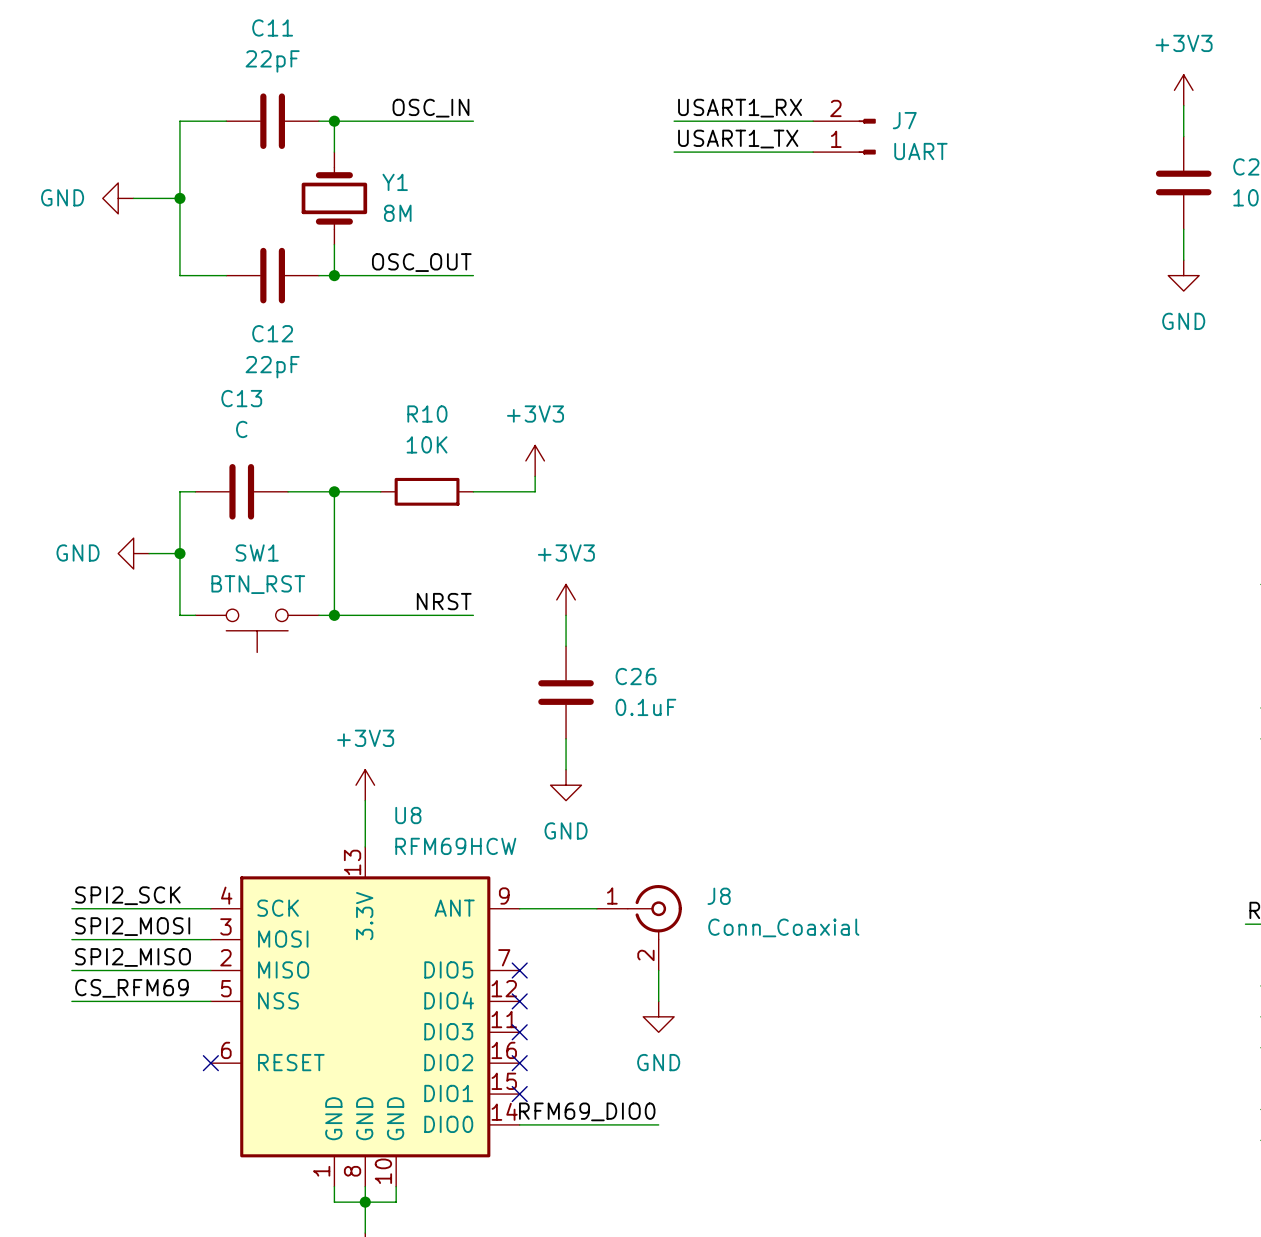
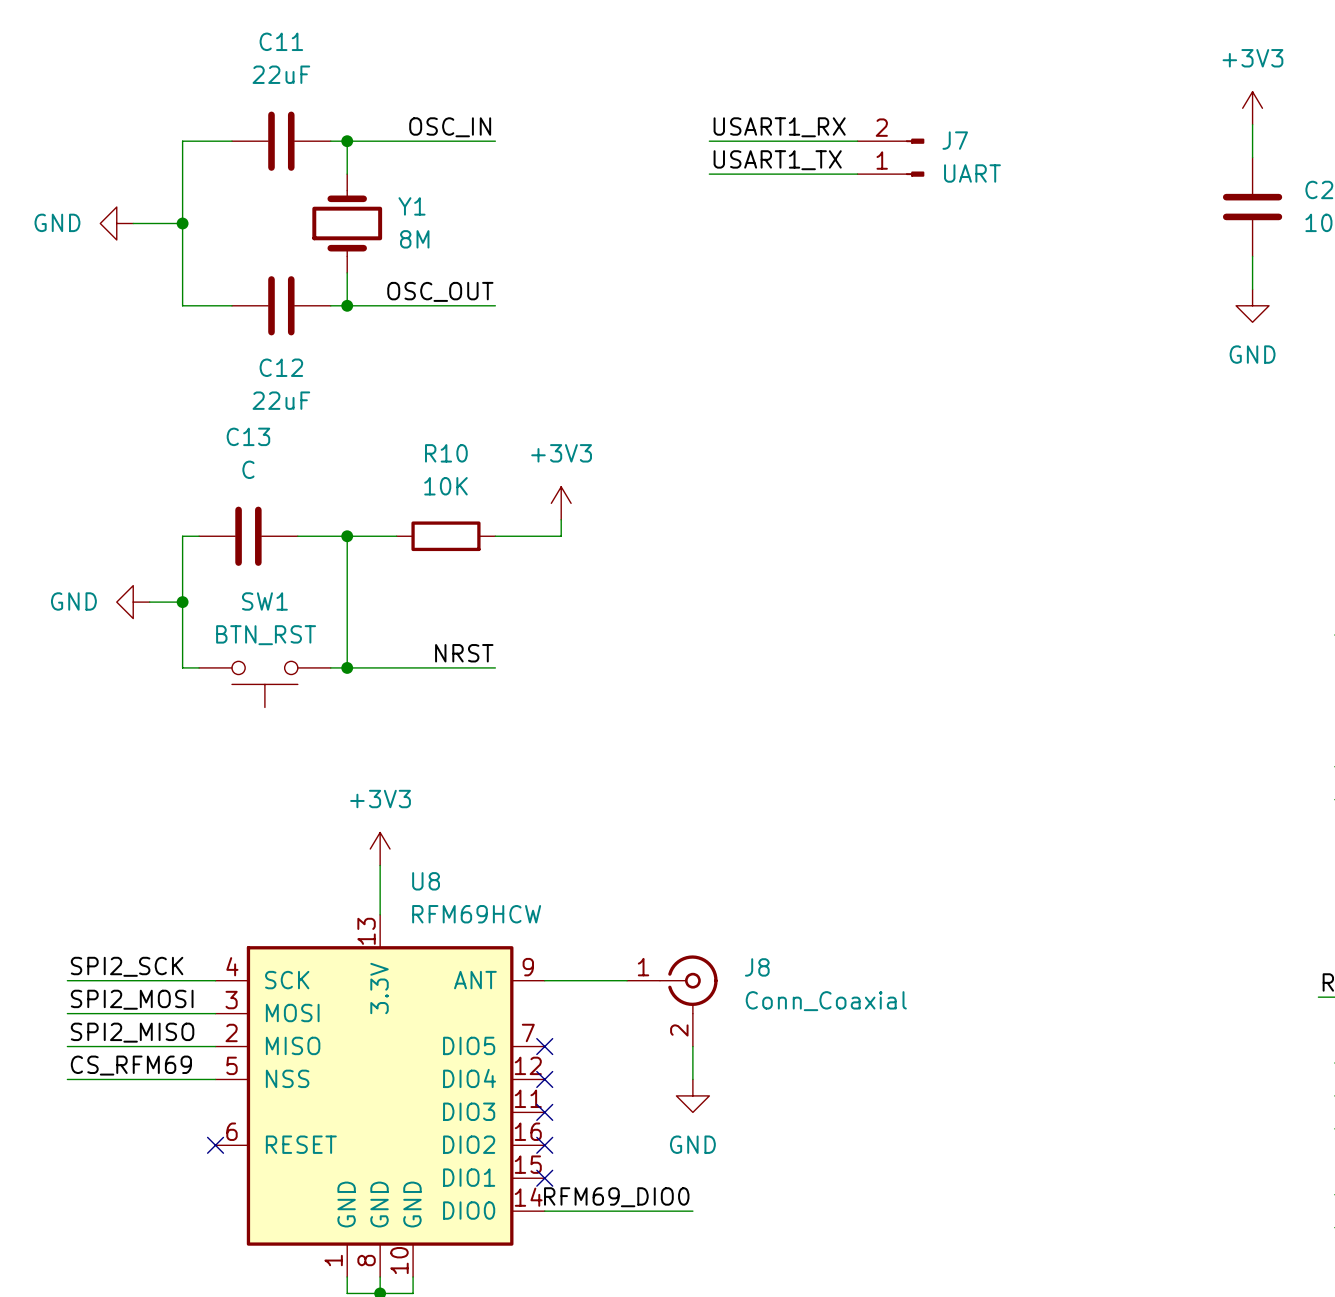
C11 value: 22pF (272, 61) -> 22uF (281, 74)
C12 value: 22pF (272, 367) -> 22uF (281, 400)
power symbol: +3V3 (566, 599) -> none
wire: (566, 615) (566, 646) -> none
C26: 0.1uF (566, 692) -> none
wire: (566, 738) (566, 769) -> none
power symbol: GND (566, 785) -> none

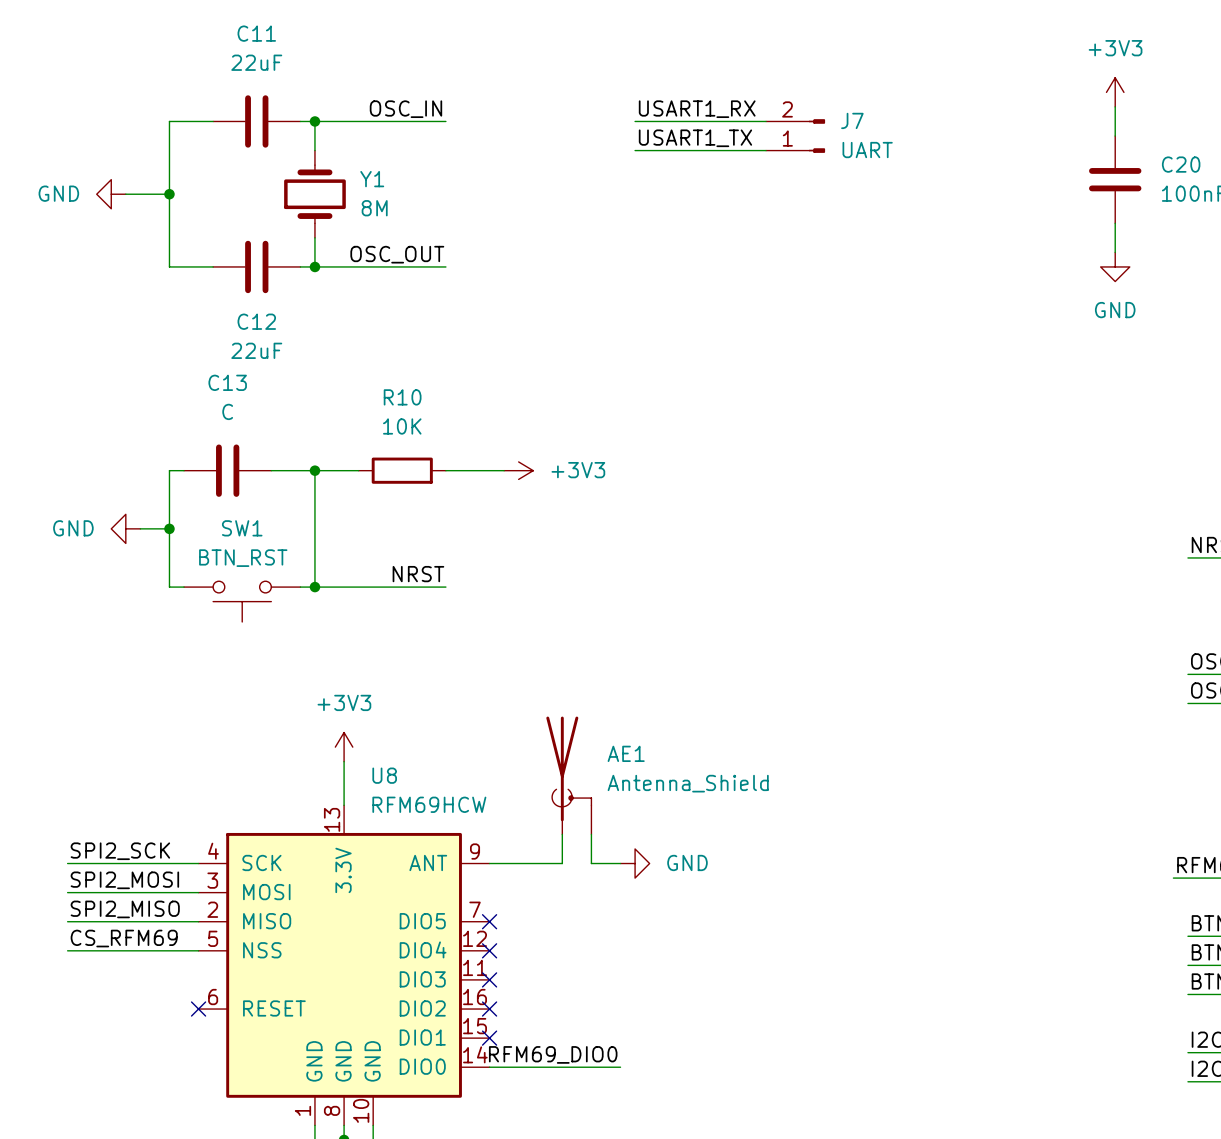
power symbol rotation: 0° (561, 503) -> 90° clockwise (518, 470)
power symbol position: +3V3 (561, 503) -> +3V3 (518, 470)
wire: (561, 519) (561, 536) -> none
AE1: none -> Antenna_Shield (568, 775)
wire: none -> (591, 834) (591, 863) (620, 863)
J8: Conn_Coaxial (672, 1000) -> none
wire: (692, 1046) (692, 1079) -> (562, 834) (562, 863)
power symbol rotation: 0° (692, 1095) -> 90° counterclockwise (635, 863)
power symbol position: GND (692, 1095) -> GND (635, 863)

